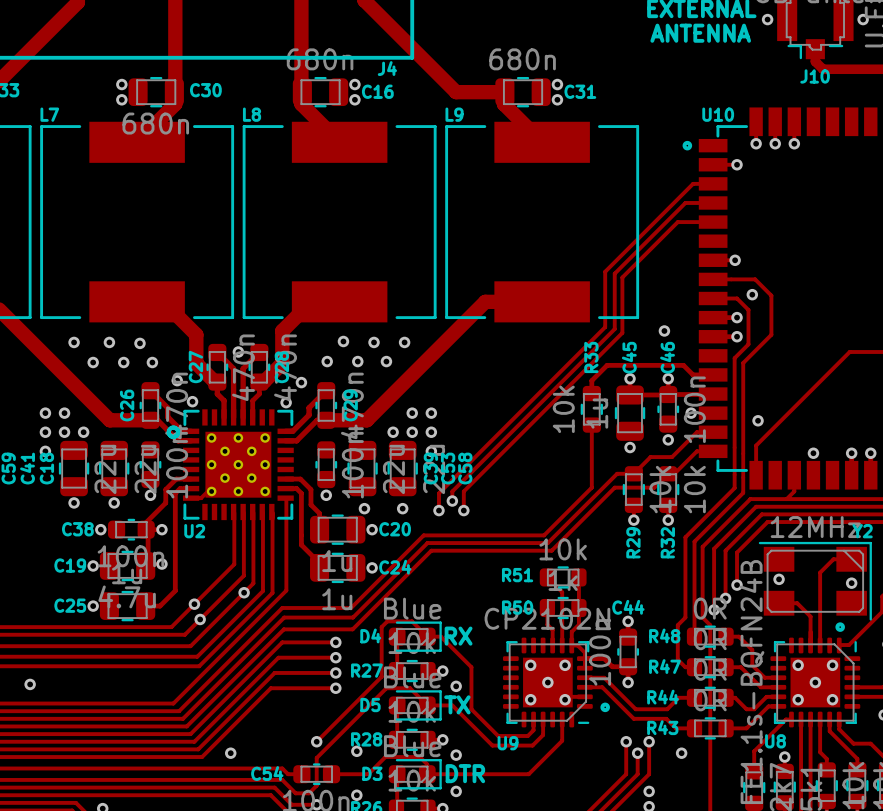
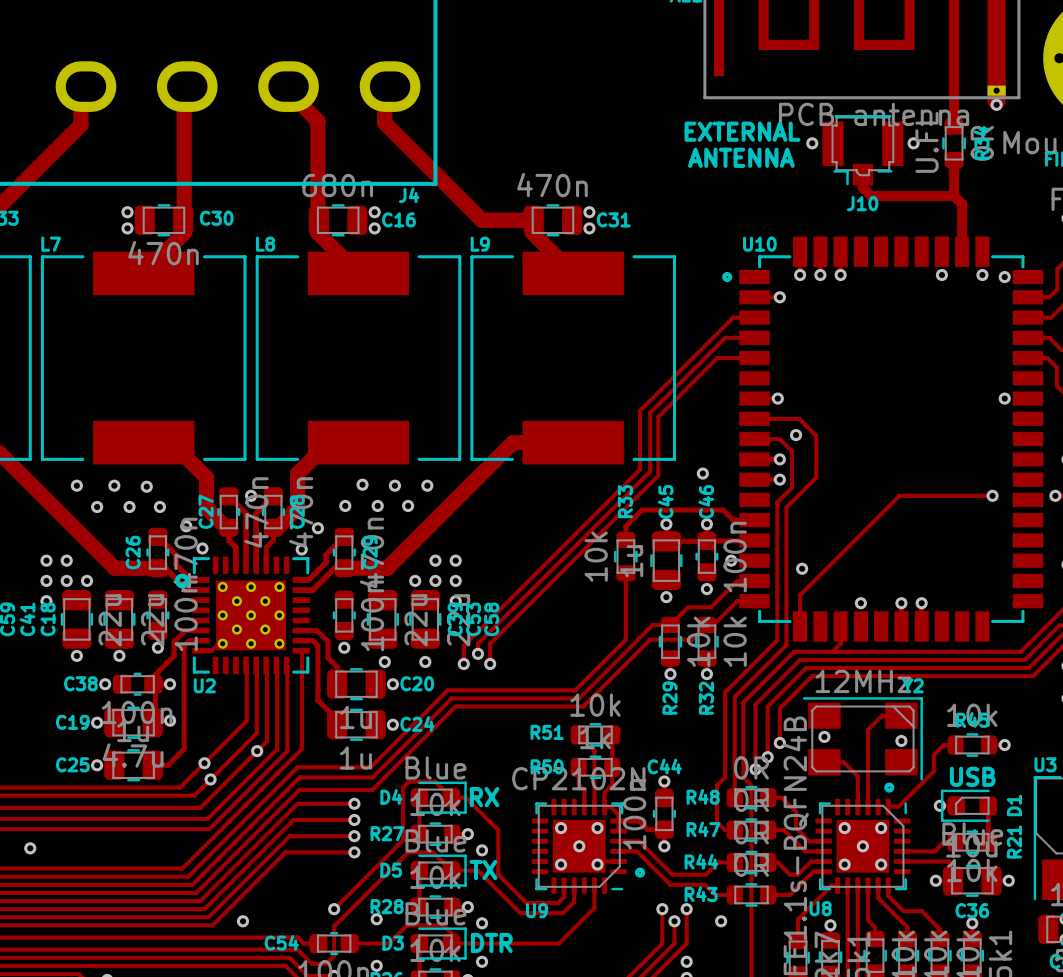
C31 value: 680n (522, 59) -> 470n (552, 185)
C30 value: 680n (155, 123) -> 470n (163, 253)

